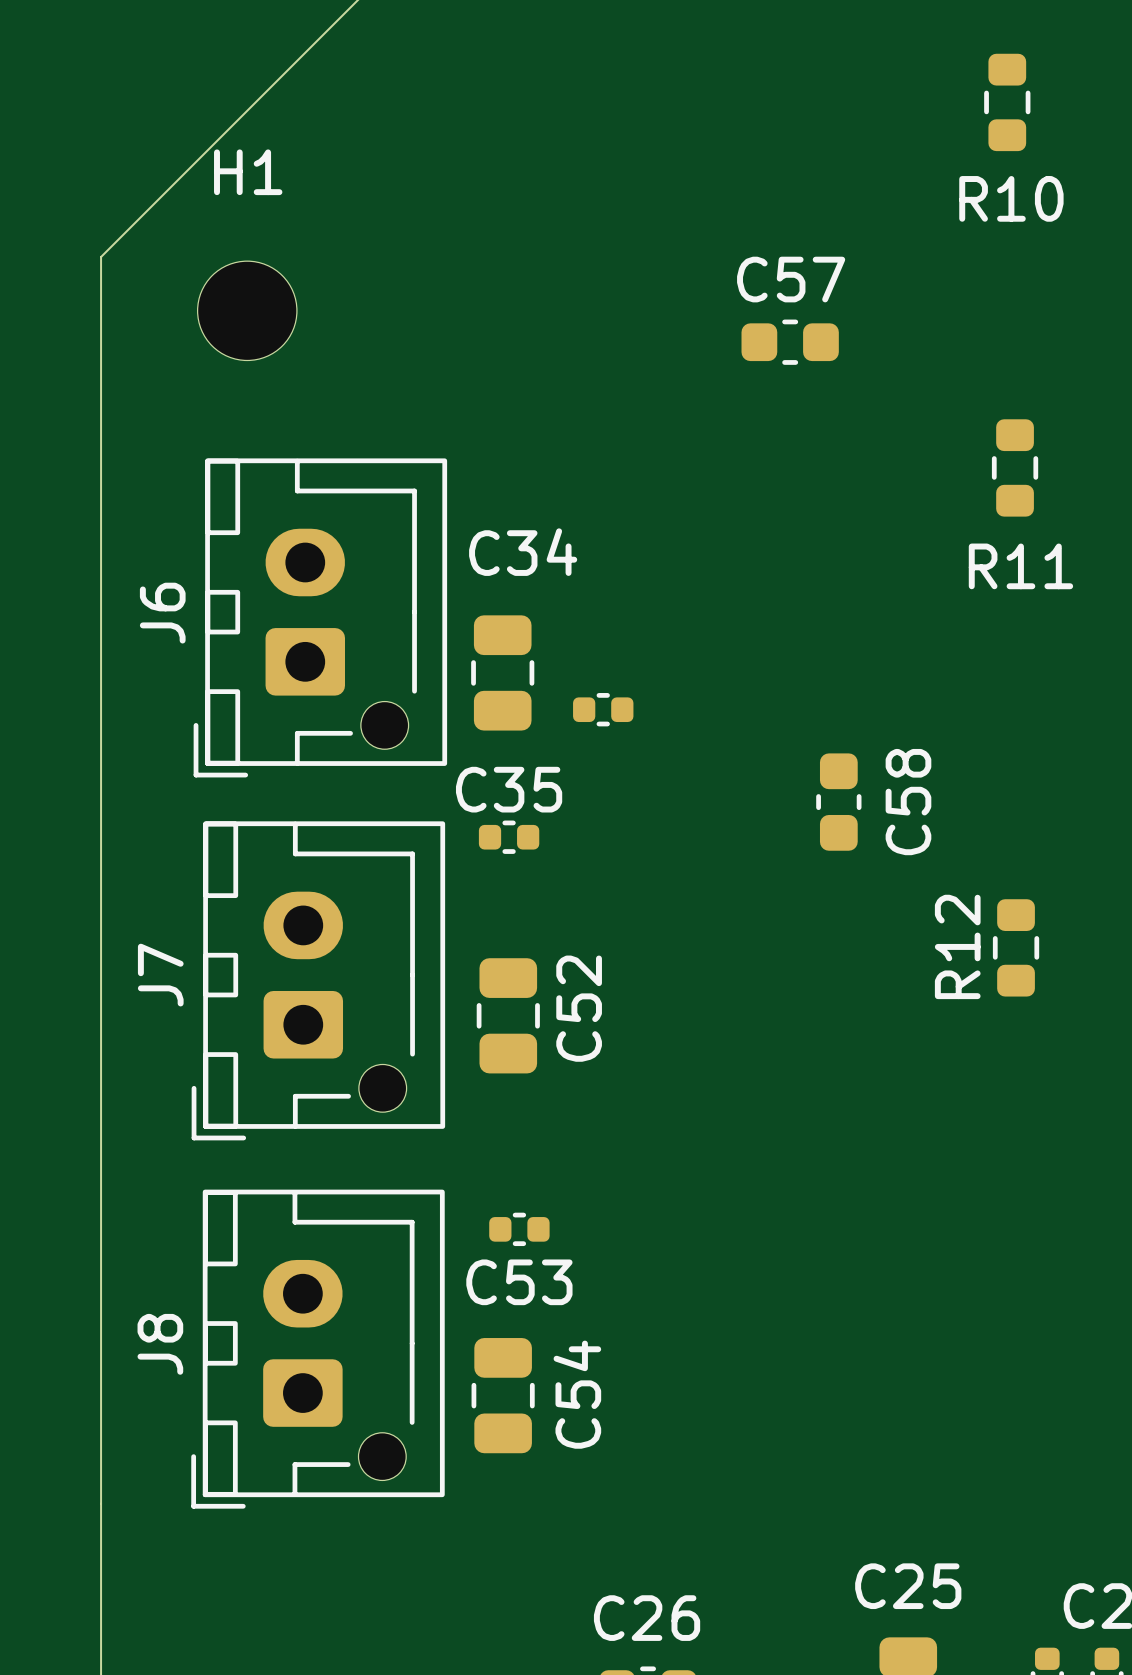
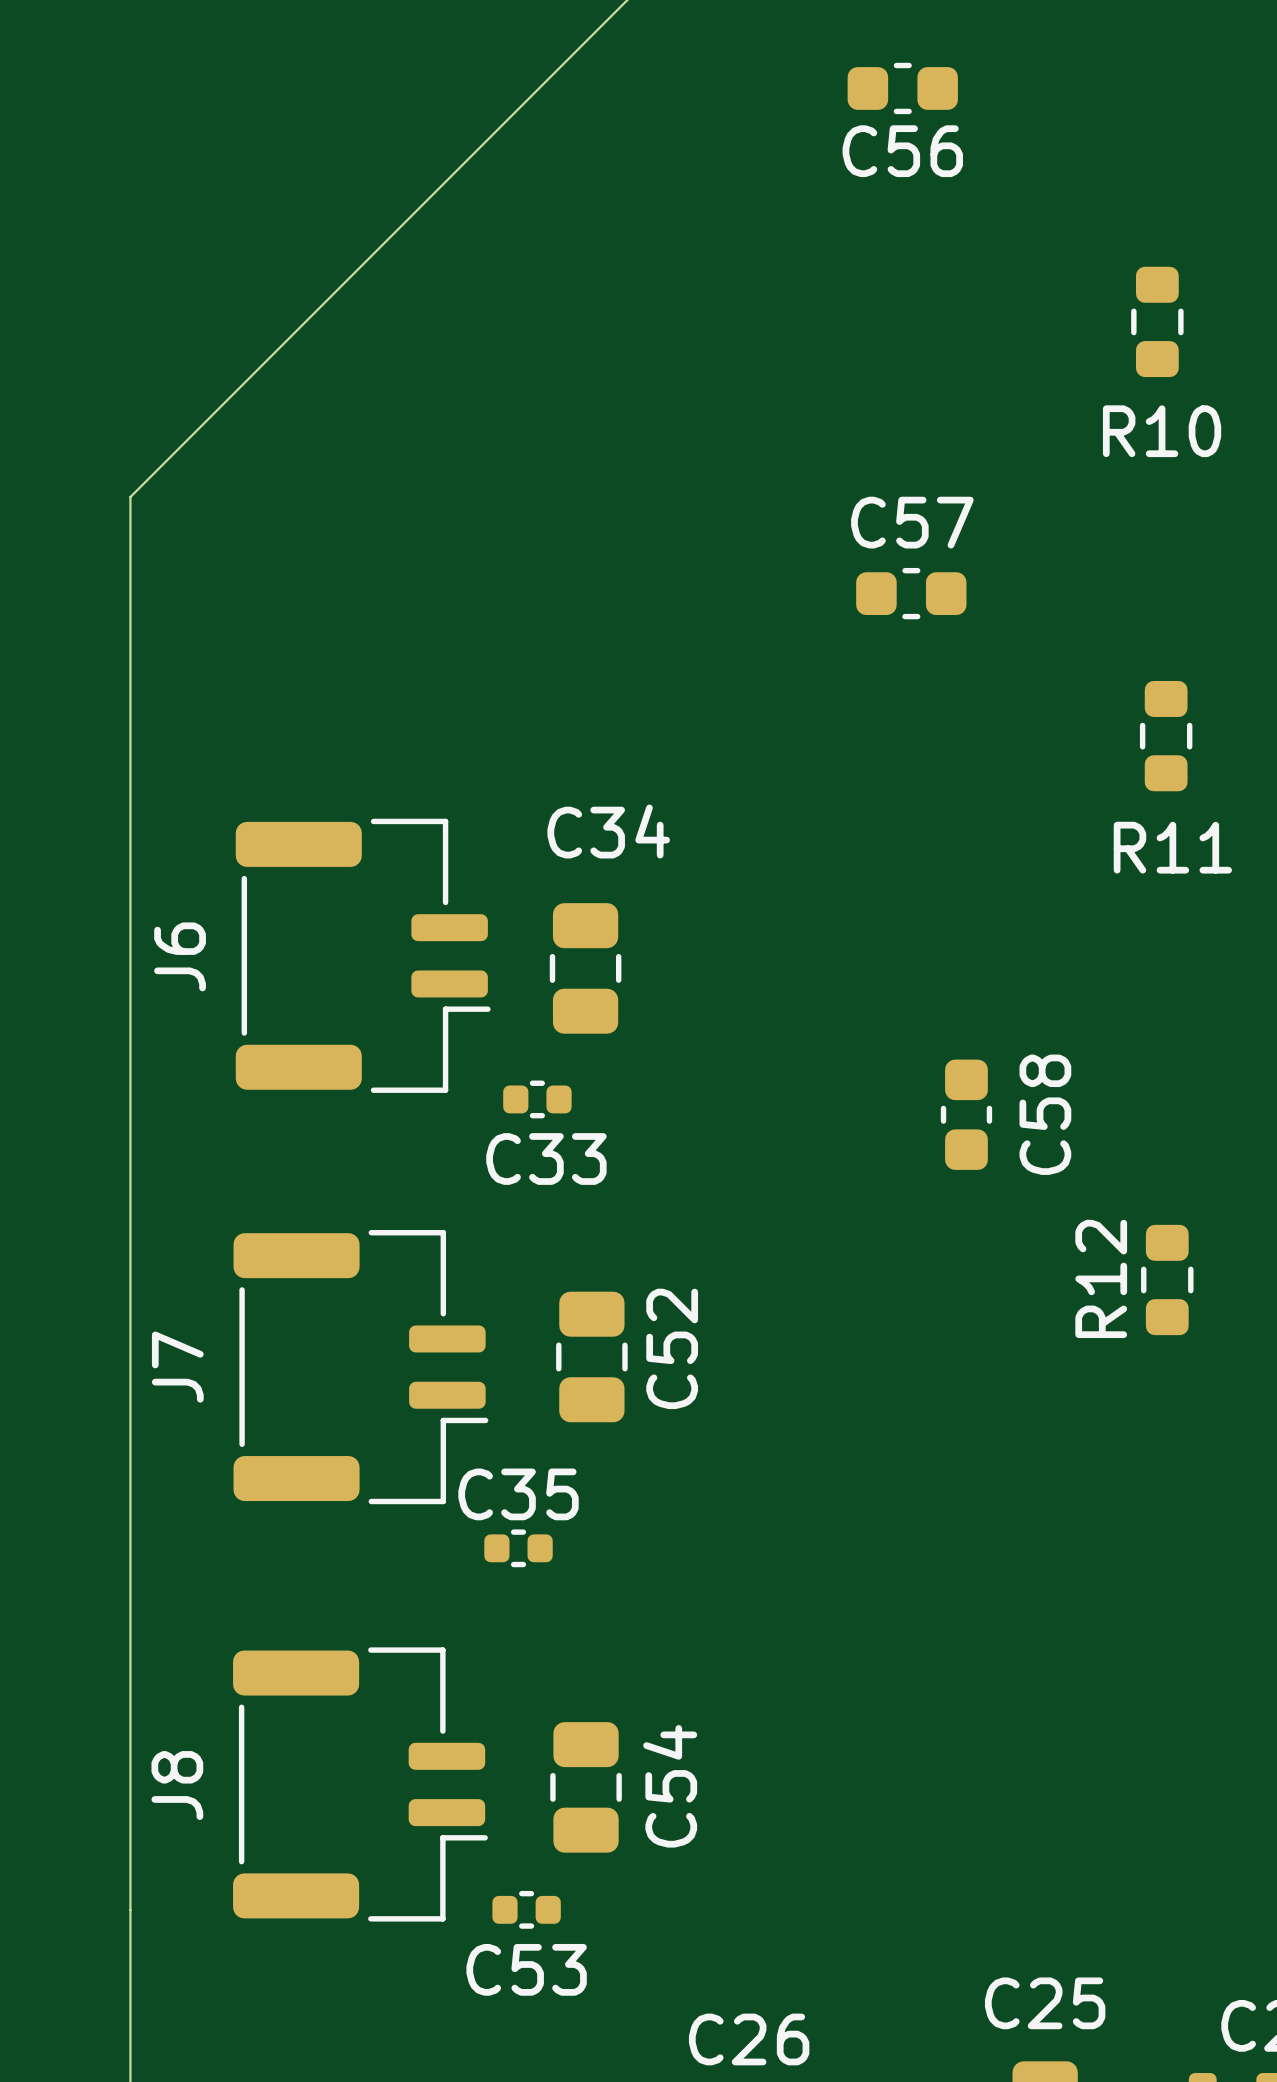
H1: (247, 310) -> none
J6 footprint: [193, 458, 448, 778] -> [235, 818, 491, 1093]
part: (603, 709) -> none
C33: none -> (537, 1099)
J7 footprint: [191, 821, 446, 1141] -> [233, 1230, 489, 1505]
C35 position: (509, 837) -> (518, 1548)
J8 footprint: [191, 1189, 445, 1509] -> [233, 1647, 488, 1922]
C53 position: (519, 1229) -> (526, 1909)

